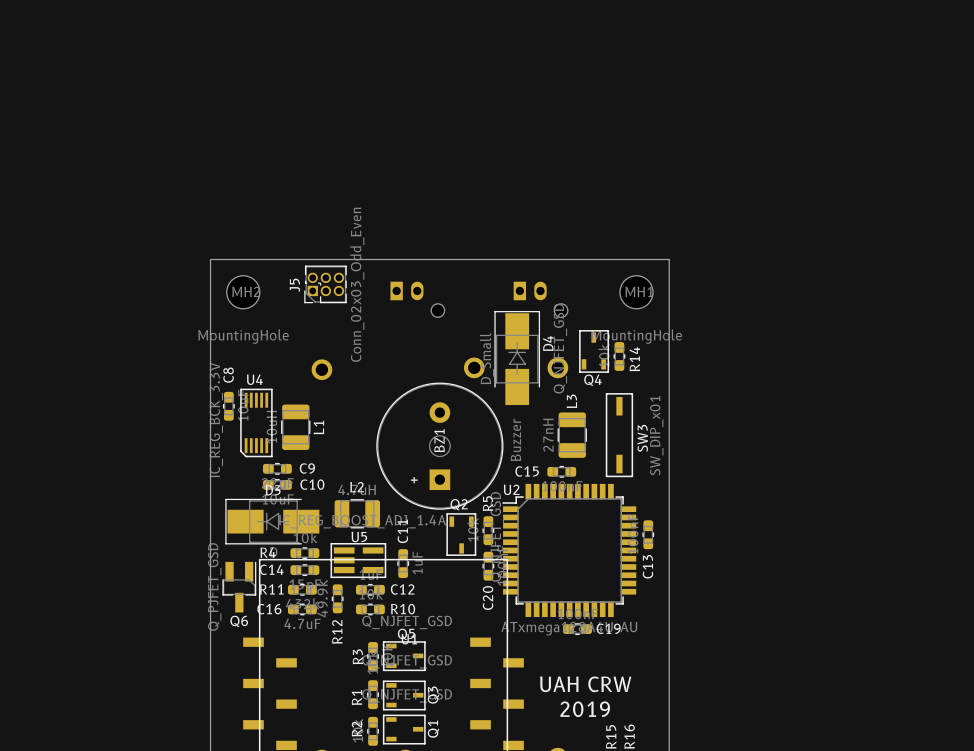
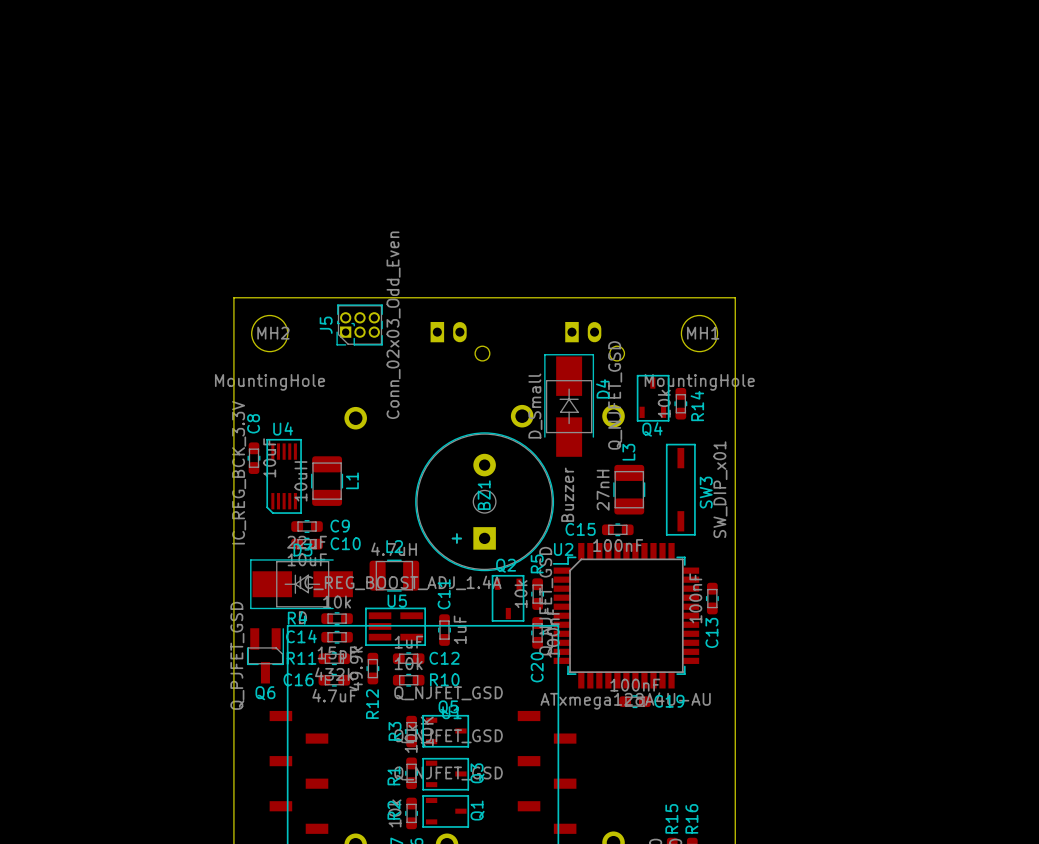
text: UAH CRW (585, 684) -> none
text: 2019 (585, 709) -> none

